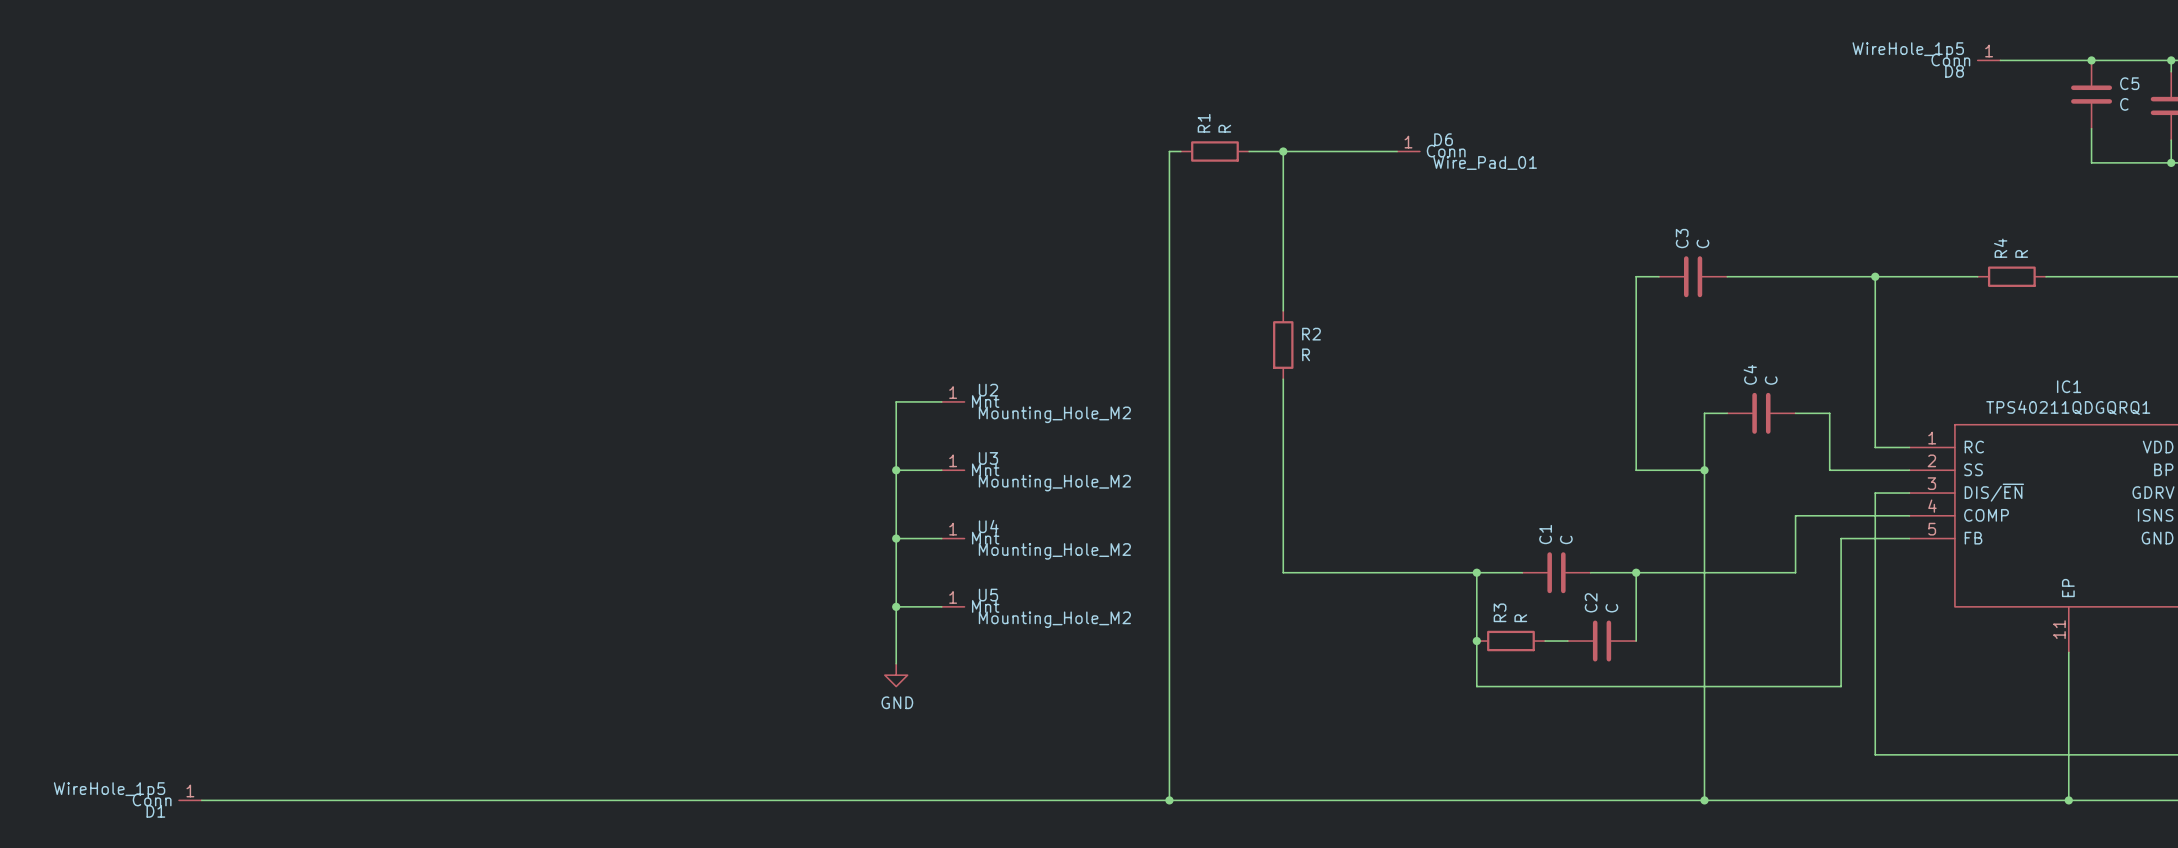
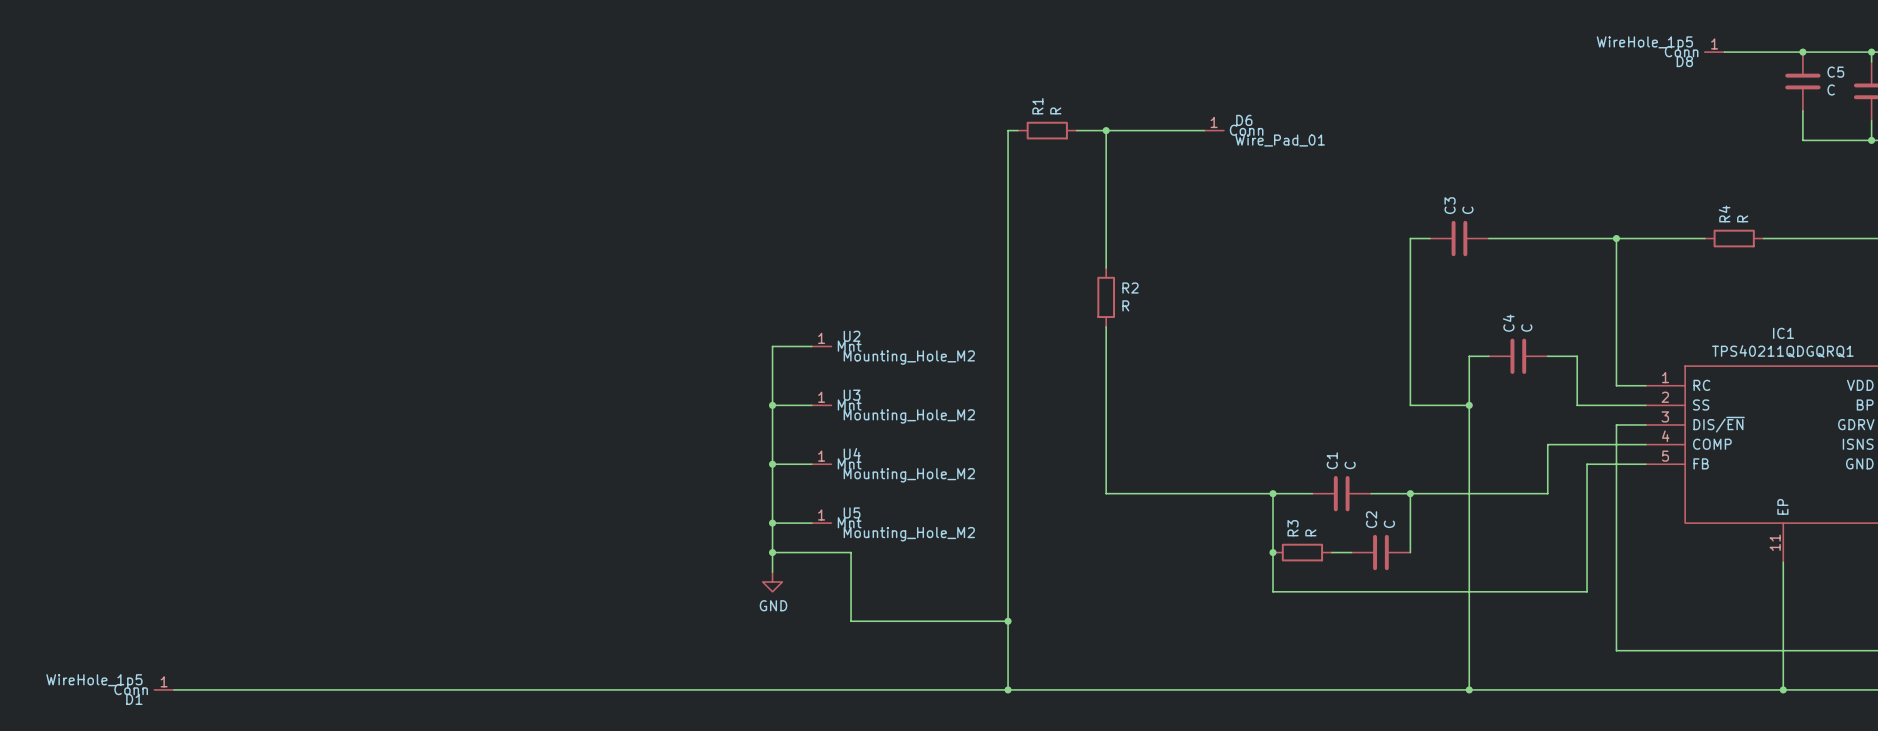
wire: none -> (772, 552) (851, 552) (851, 621) (1008, 621)
junction: none -> (772, 552)
junction: none -> (1008, 621)

